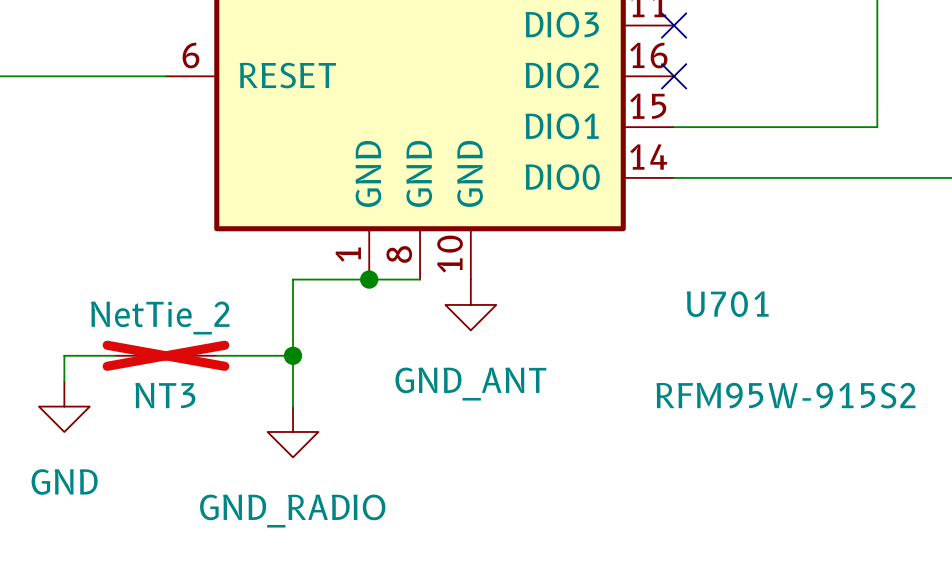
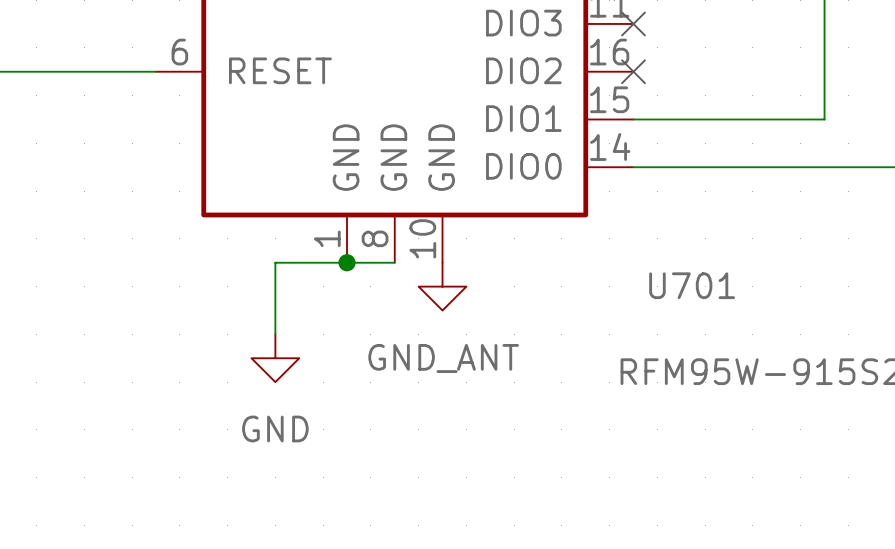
wire: (115, 355) (64, 355) (64, 381) -> none
NT3: NetTie_2 (165, 355) -> none
wire: (216, 355) (293, 355) (293, 406) -> none
junction: (293, 355) -> none
power symbol position: GND (64, 406) -> GND (275, 358)
power symbol: GND_RADIO (293, 431) -> none

